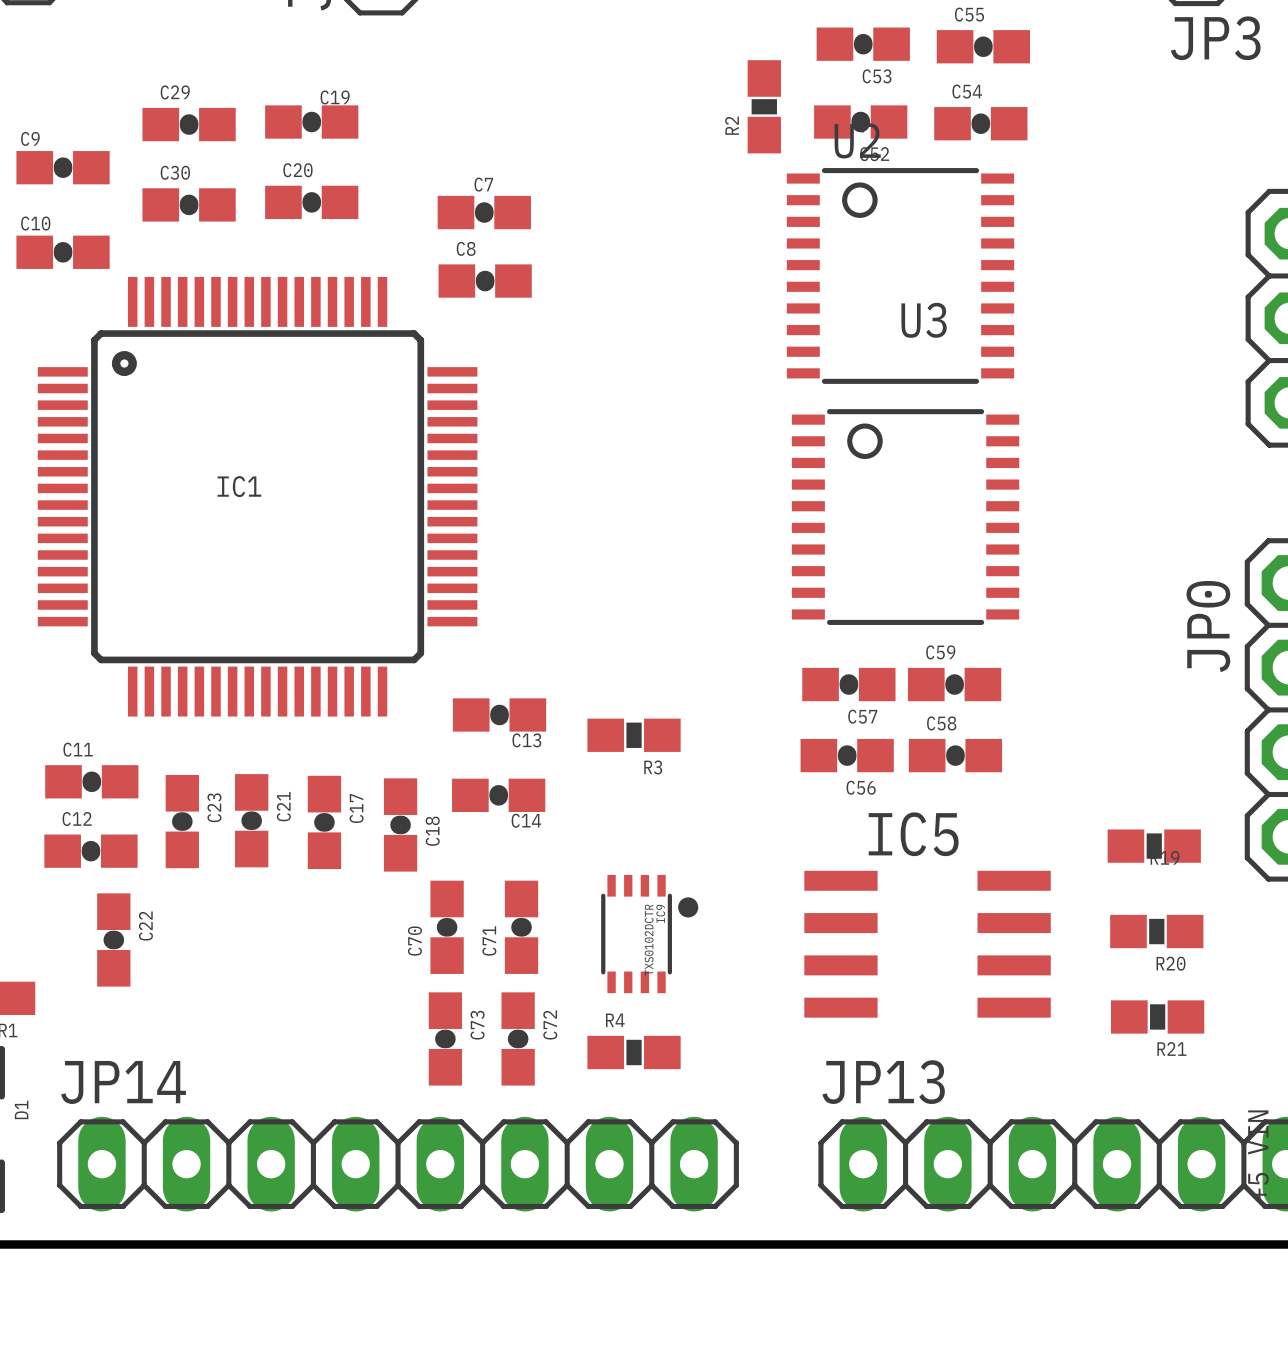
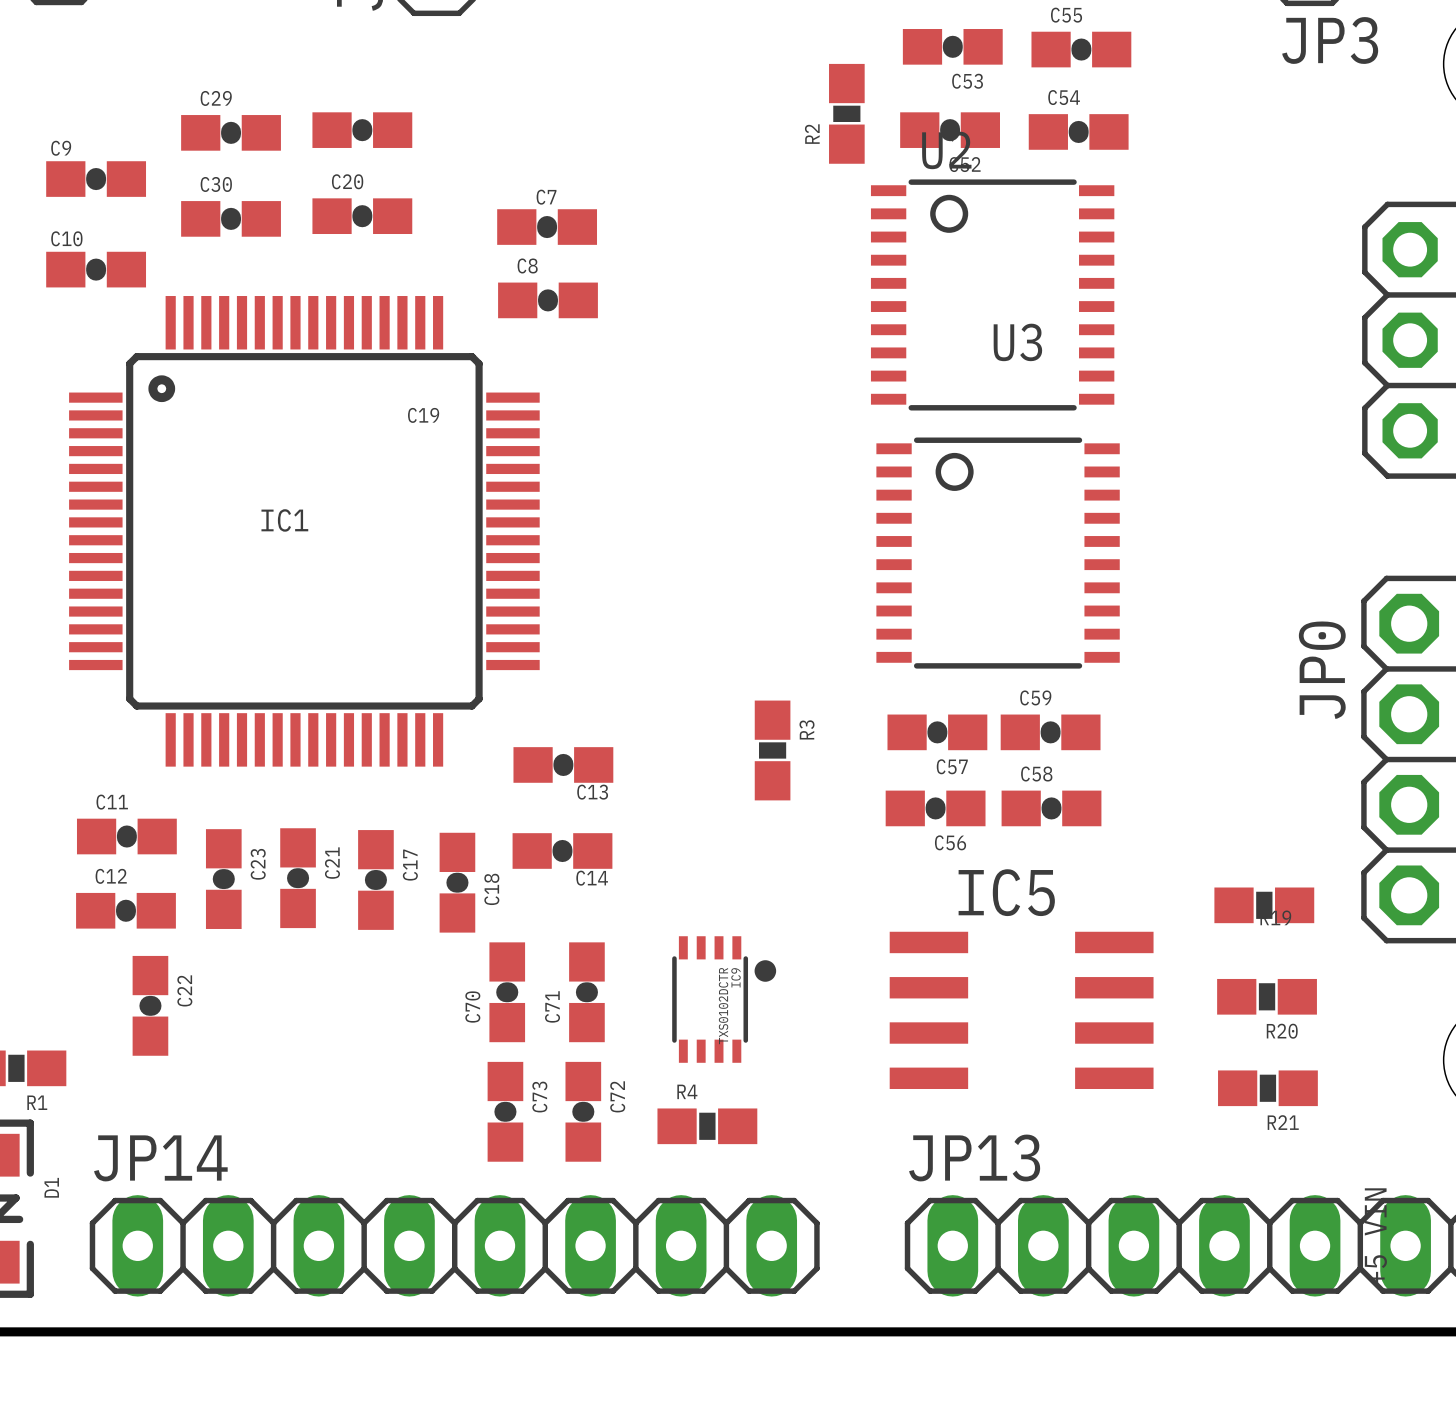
C19 name position: C19 (335, 97) -> C19 (423, 415)
R3 rotation: 0° (634, 735) -> 90° clockwise (772, 750)
R3 position: (634, 735) -> (772, 750)

